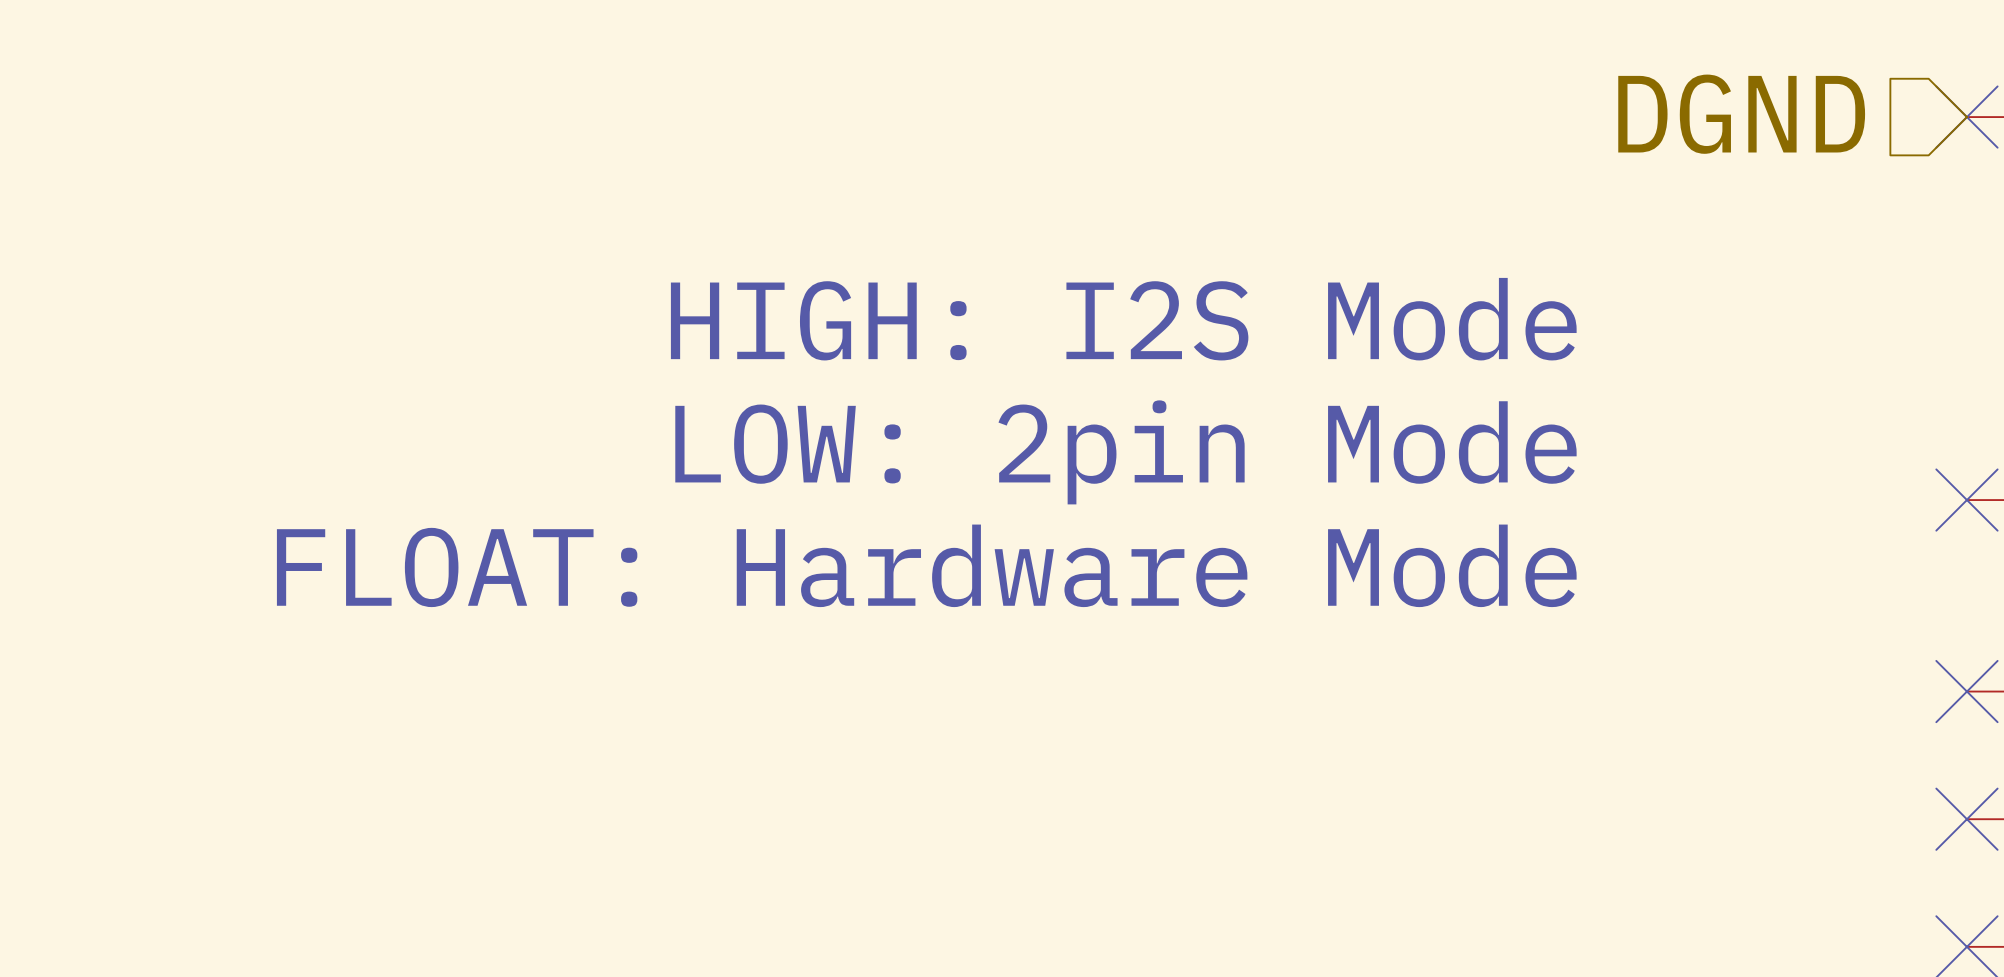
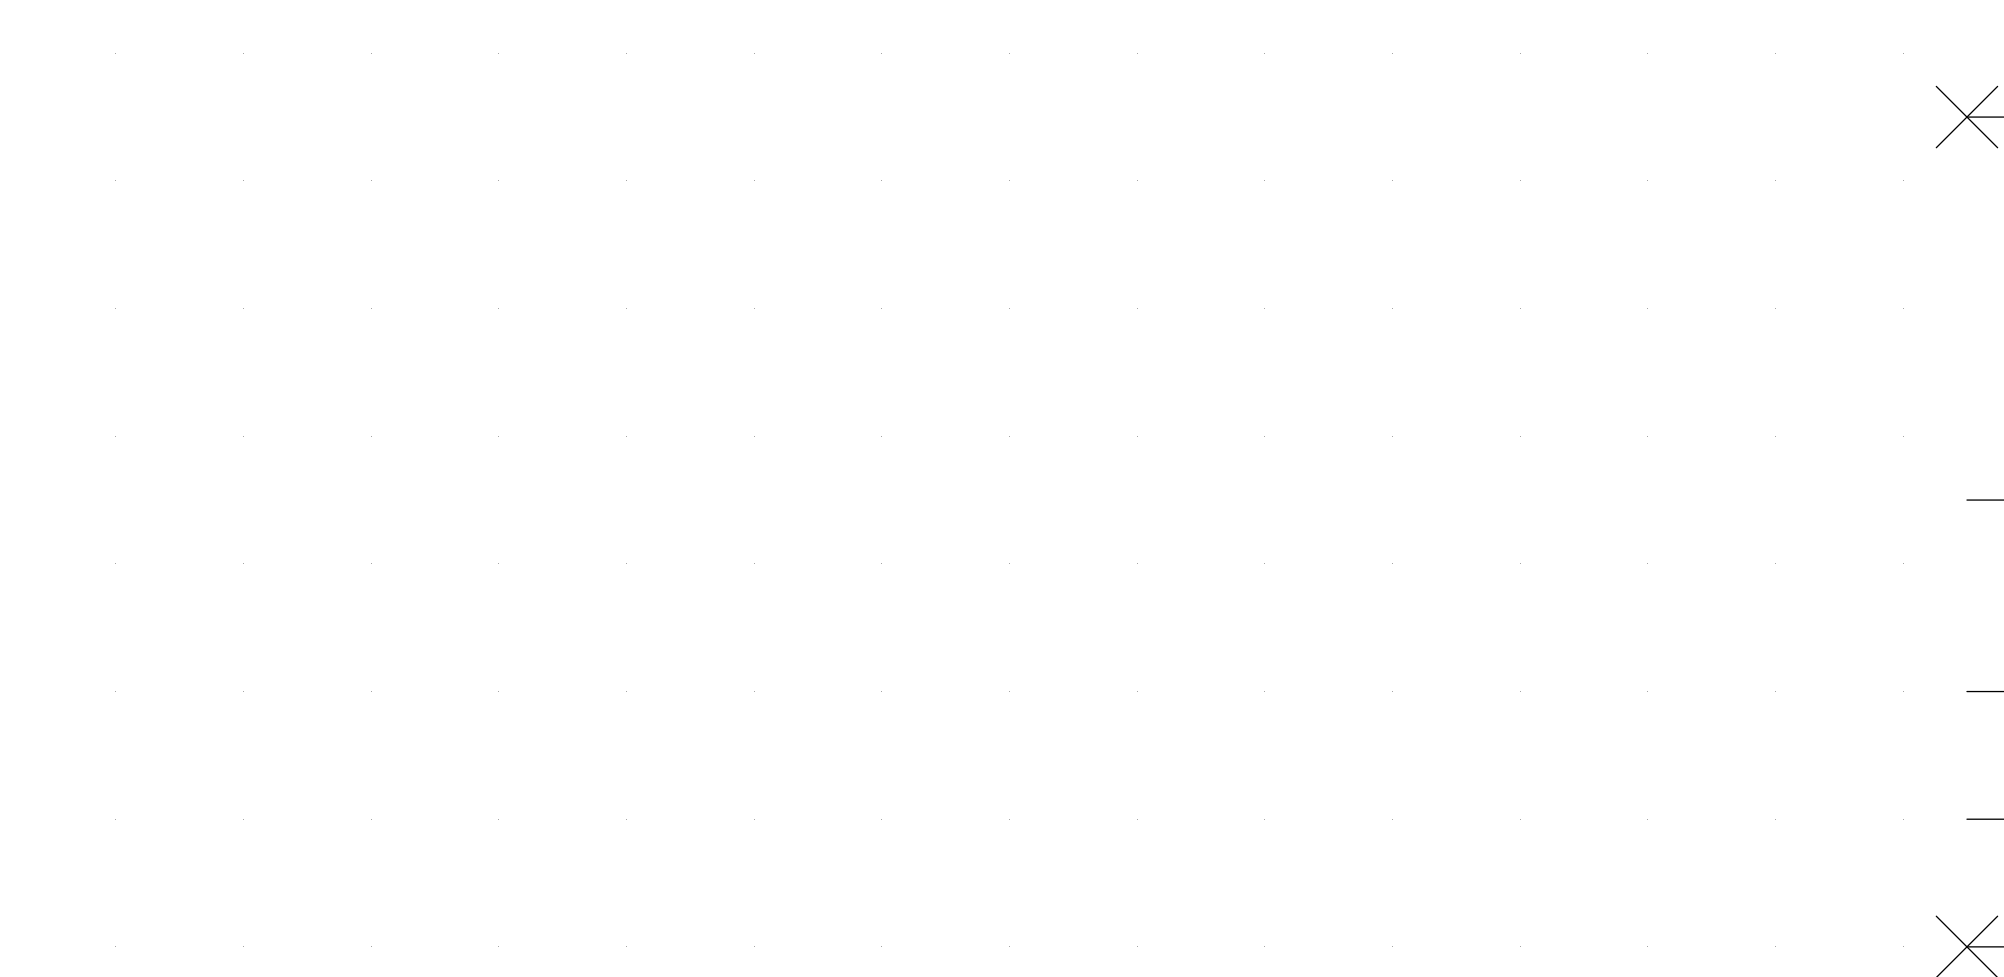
hierarchical label: DGND (1741, 114) -> none
text: HIGH: I2S Mode (1123, 319) -> none
text: LOW: 2pin Mode (1125, 452) -> none
no-connect mark: (1966, 500) -> none
text: FLOAT: Hardware Mode (926, 565) -> none
no-connect mark: (1966, 691) -> none
no-connect mark: (1966, 819) -> none

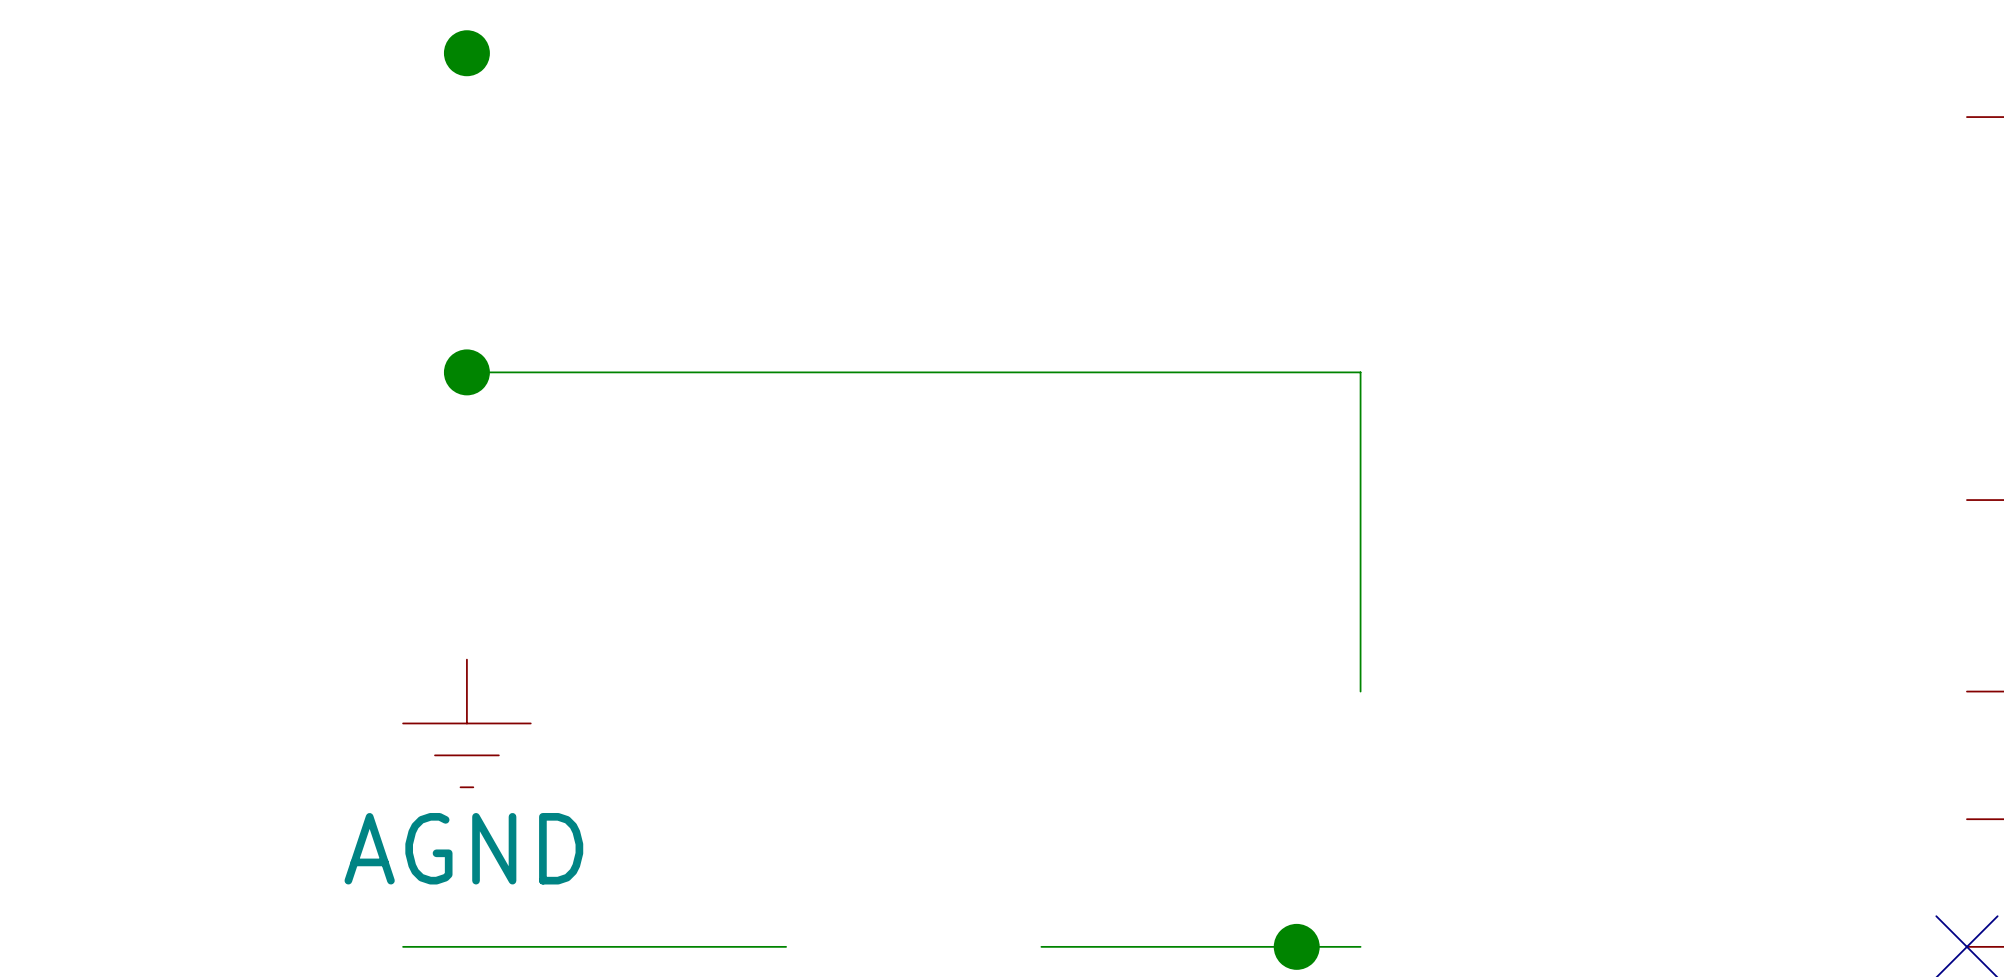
junction: none -> (466, 53)
no-connect mark: (1966, 117) -> none
wire: none -> (466, 372) (1360, 372) (1360, 691)
junction: none -> (466, 372)
power symbol: none -> AGND (466, 723)
wire: none -> (403, 946) (786, 946)
wire: none -> (1041, 946) (1360, 946)
junction: none -> (1296, 946)

